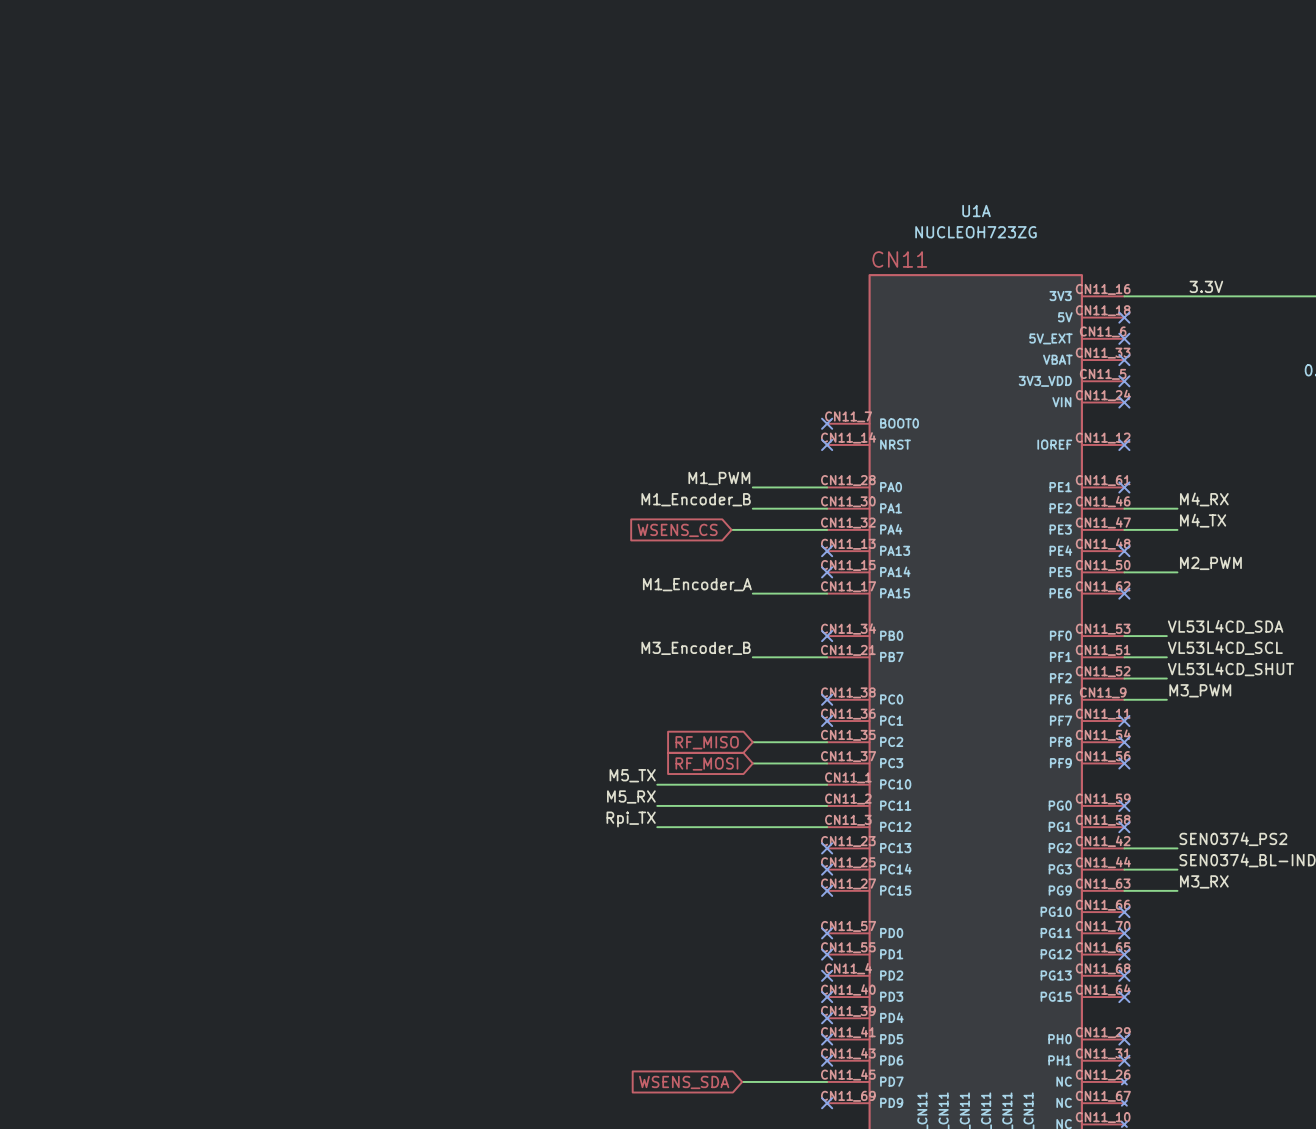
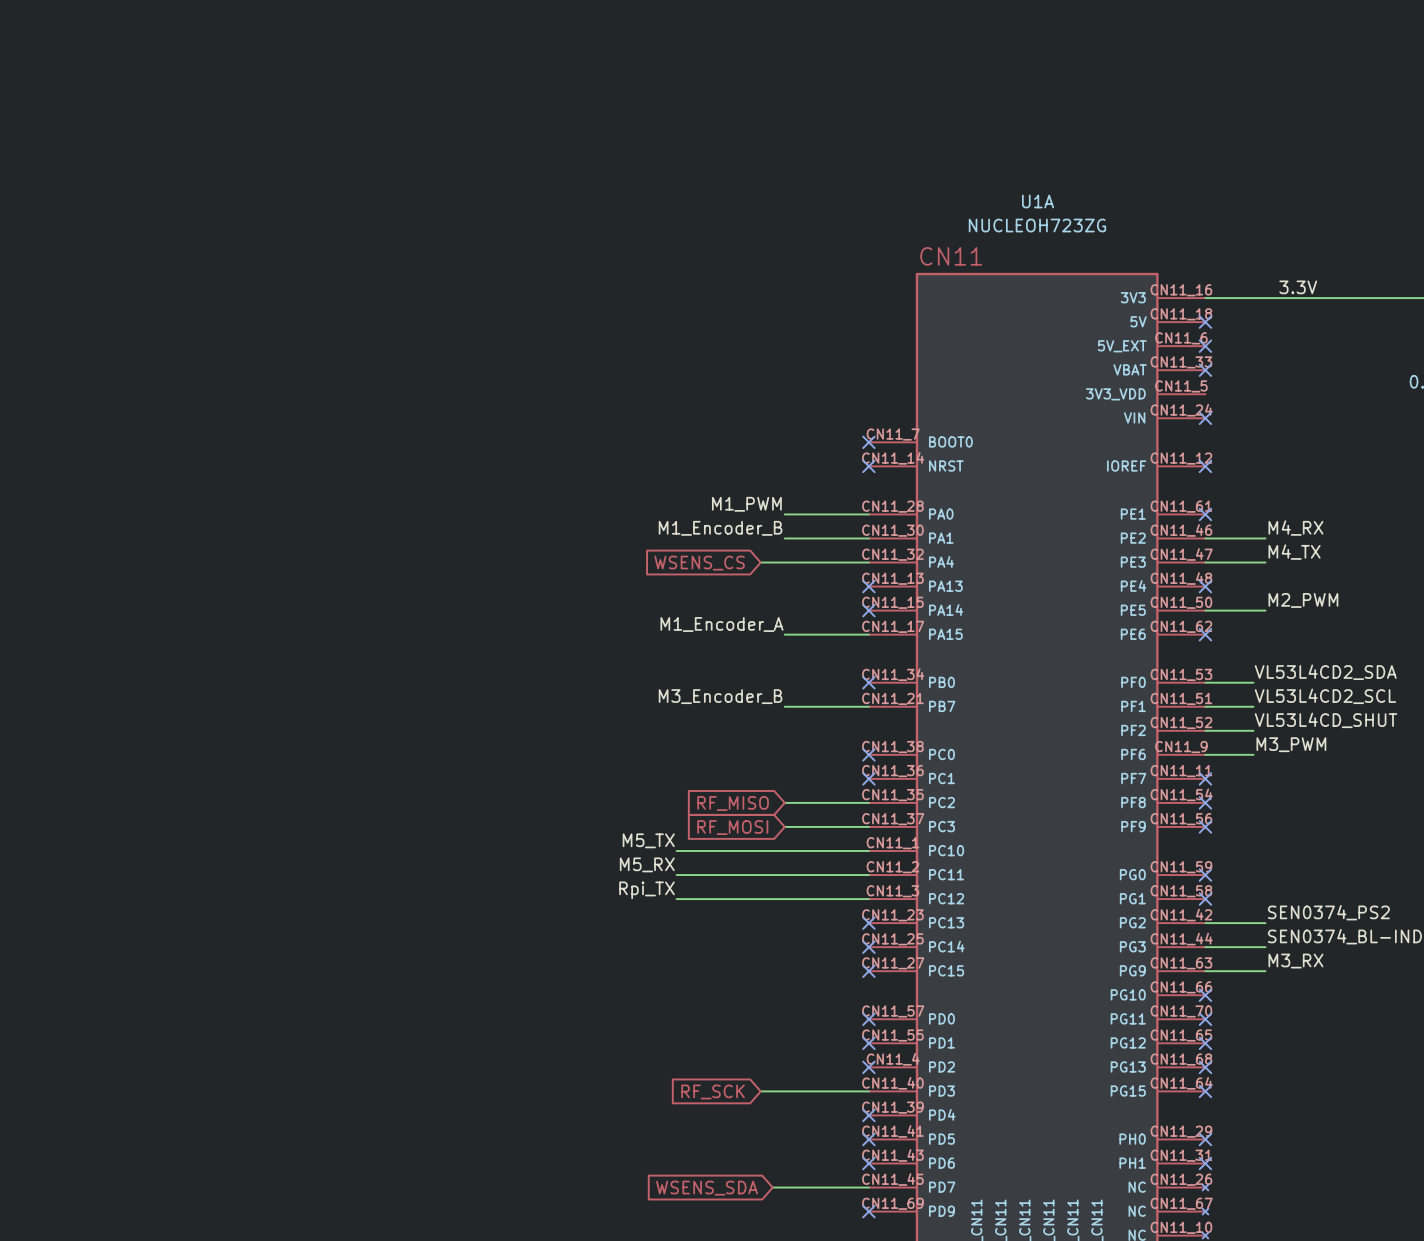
no-connect mark: (1124, 381) -> none
label: VL53L4CD_SDA (1225, 626) -> VL53L4CD2_SDA (1325, 672)
label: VL53L4CD_SCL (1225, 648) -> VL53L4CD2_SCL (1325, 696)
global label: none -> RF_SCK (713, 1091)
wire: none -> (760, 1091) (868, 1091)
no-connect mark: (827, 997) -> none

